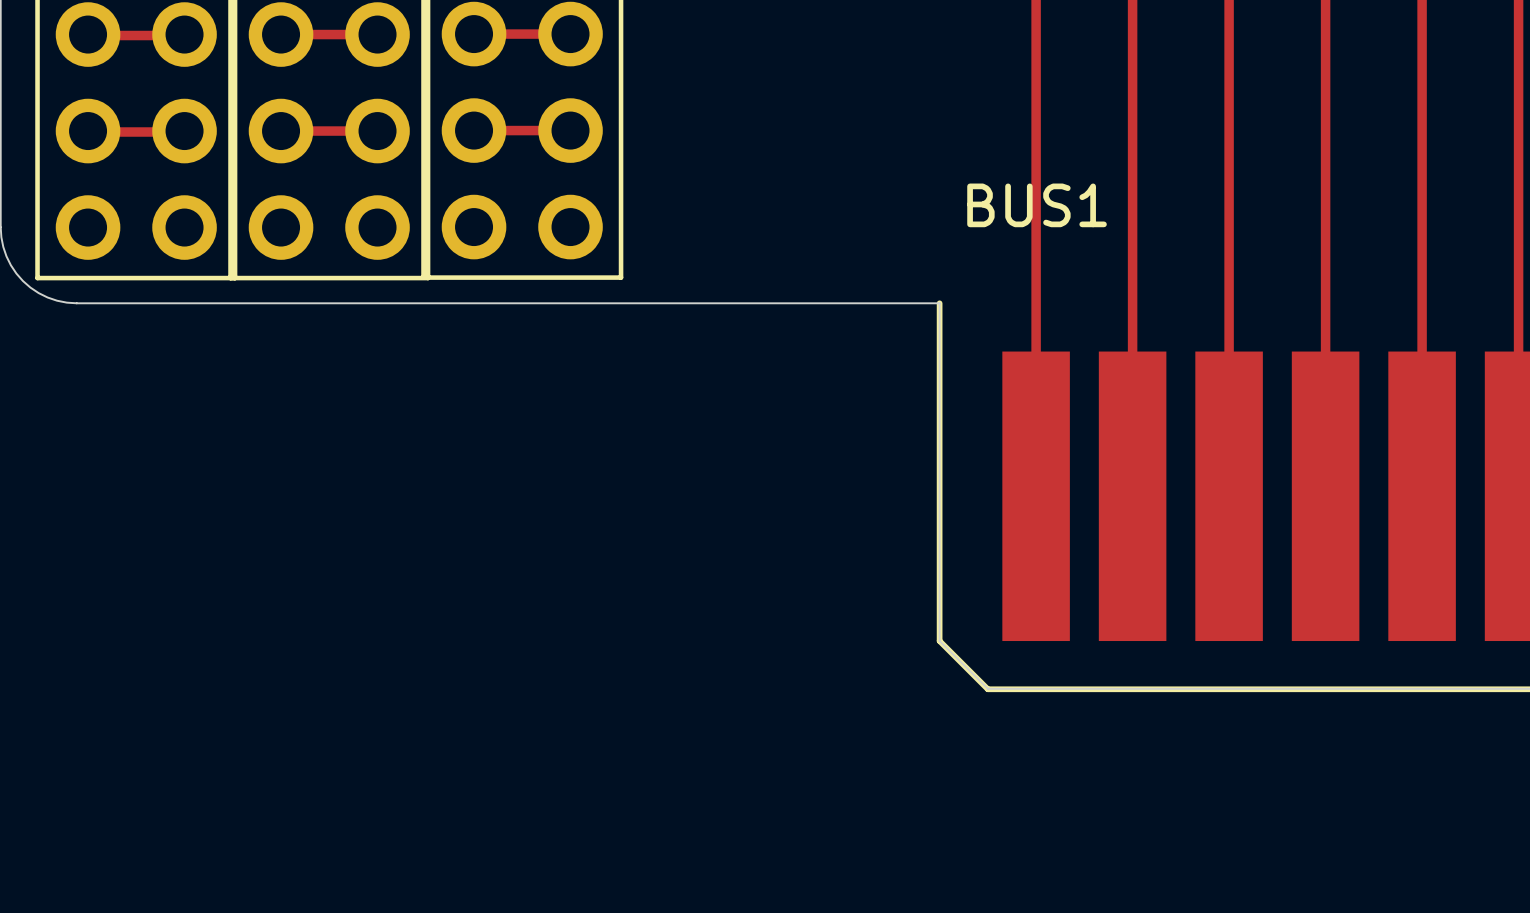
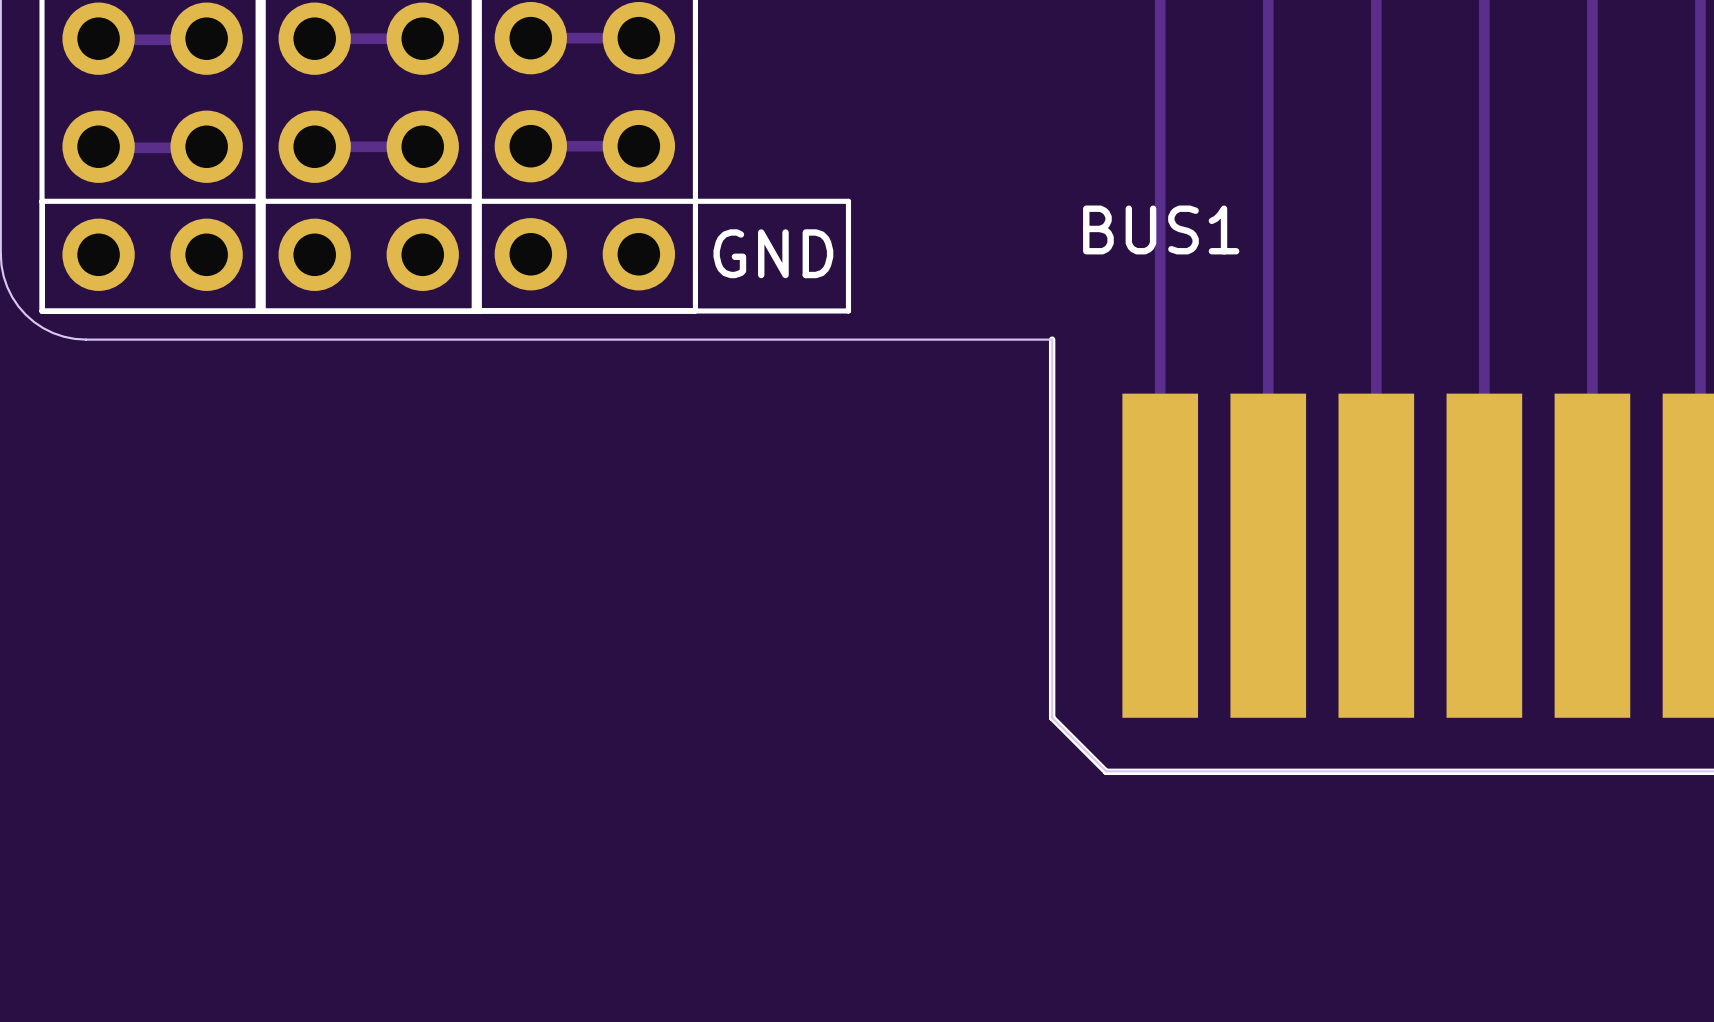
line: none -> (41, 201) (848, 201) (848, 310) (42, 310) (42, 201)
text: none -> GND (773, 253)

